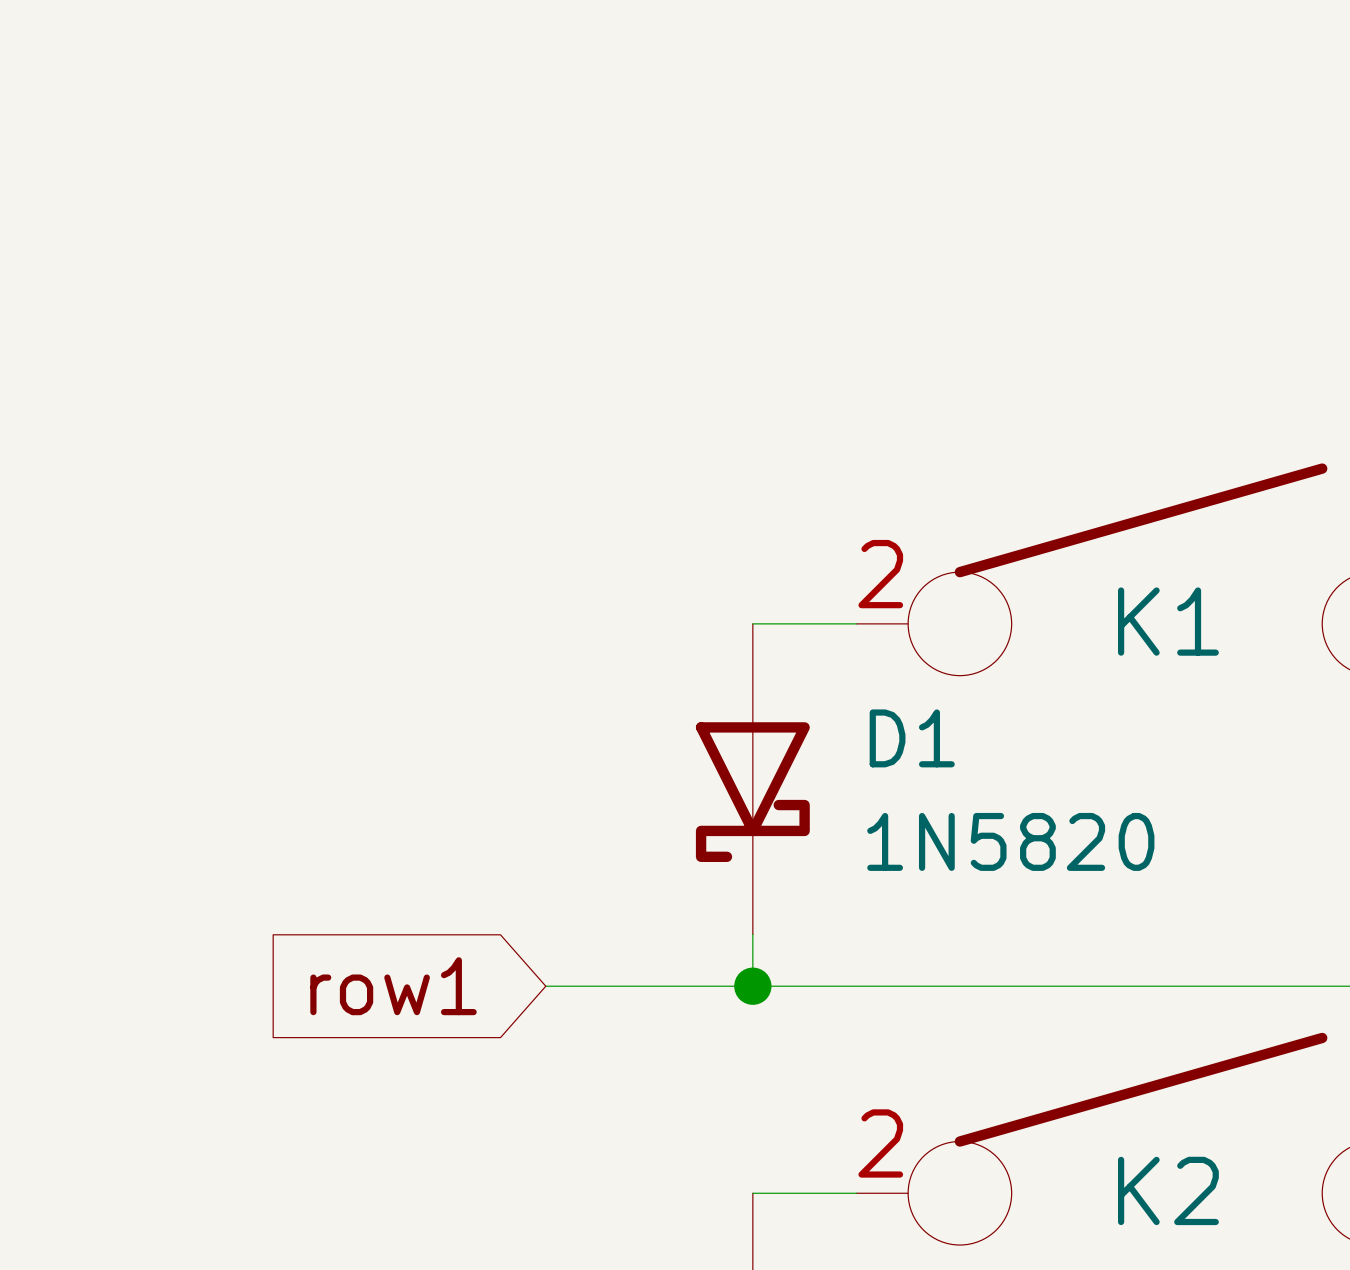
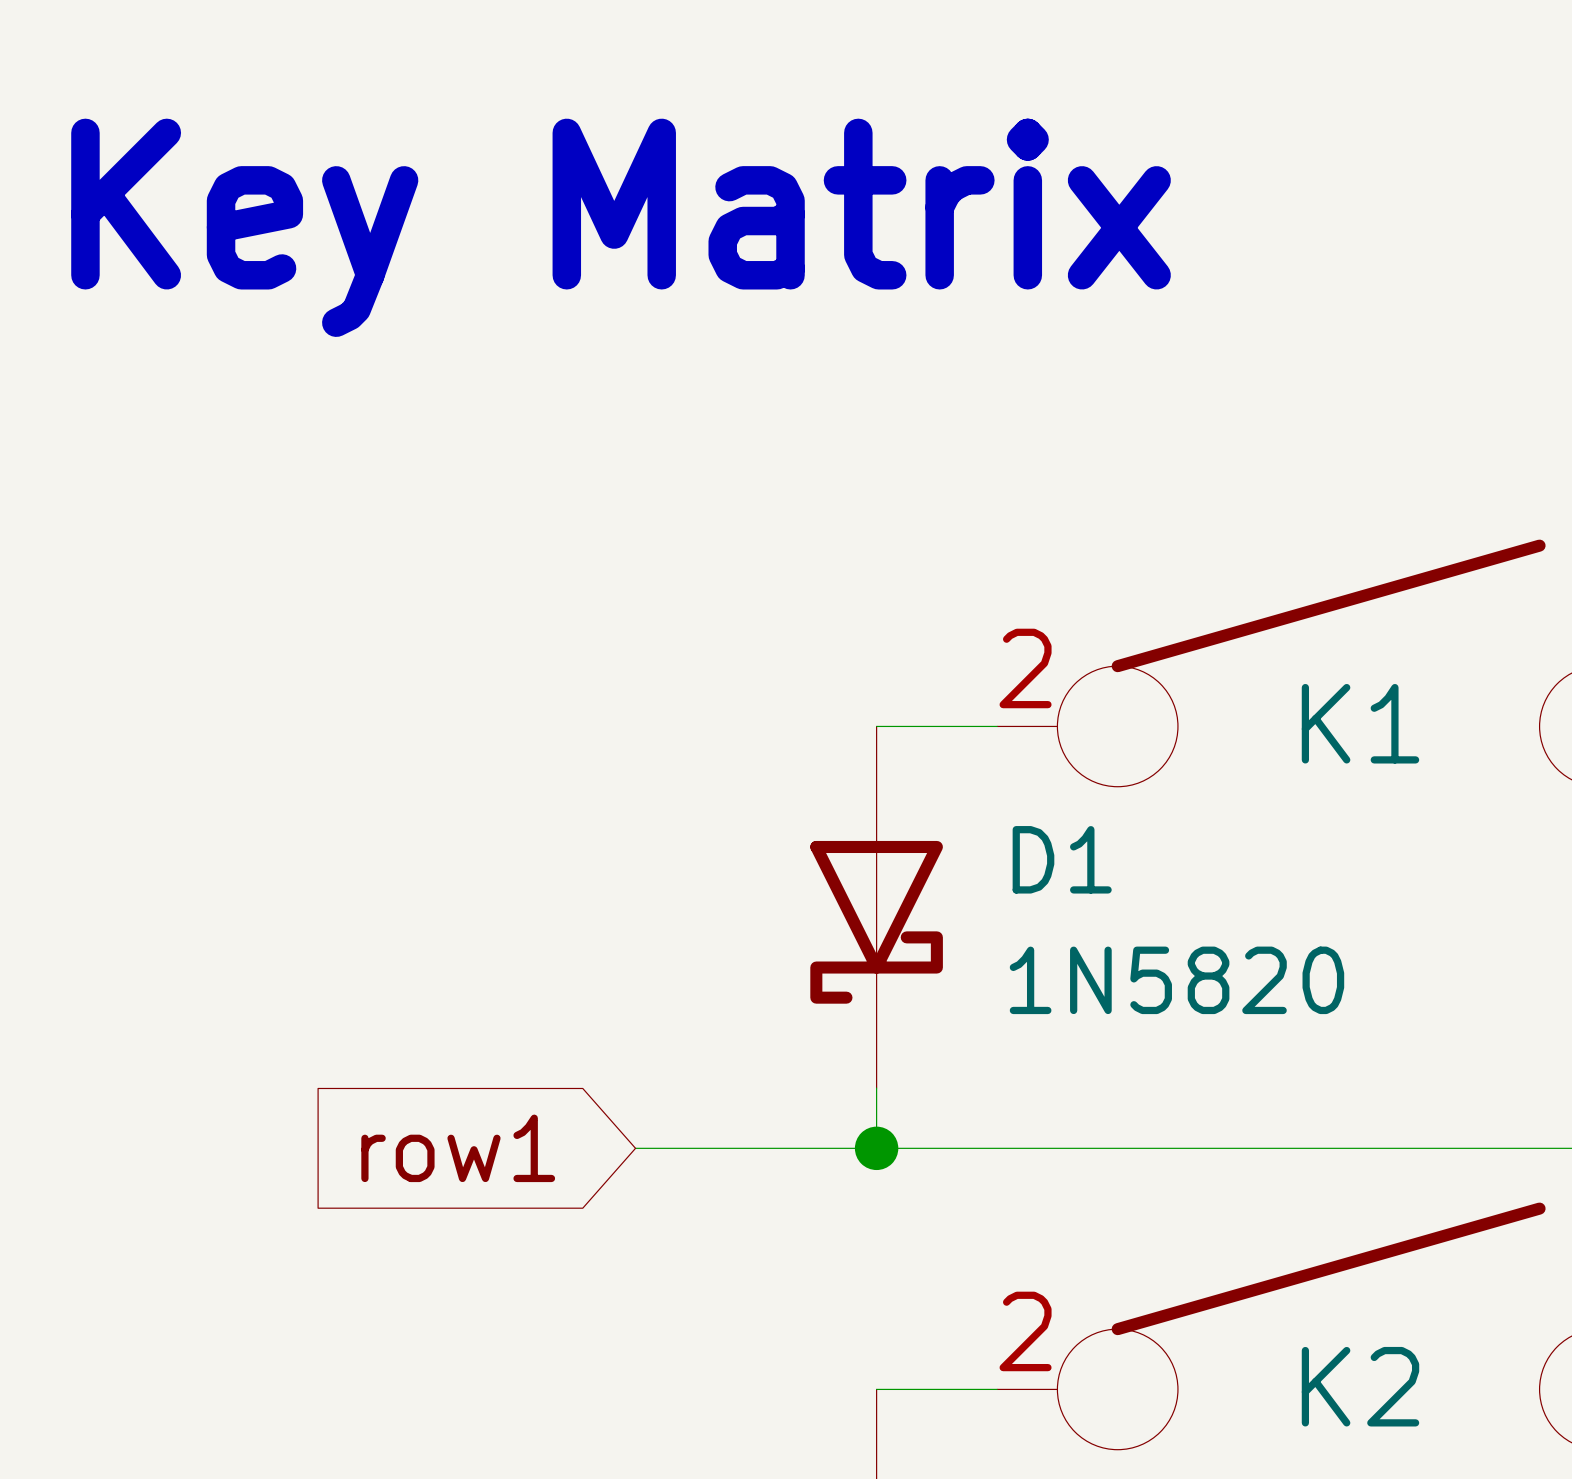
text: none -> Key Matrix (621, 227)

